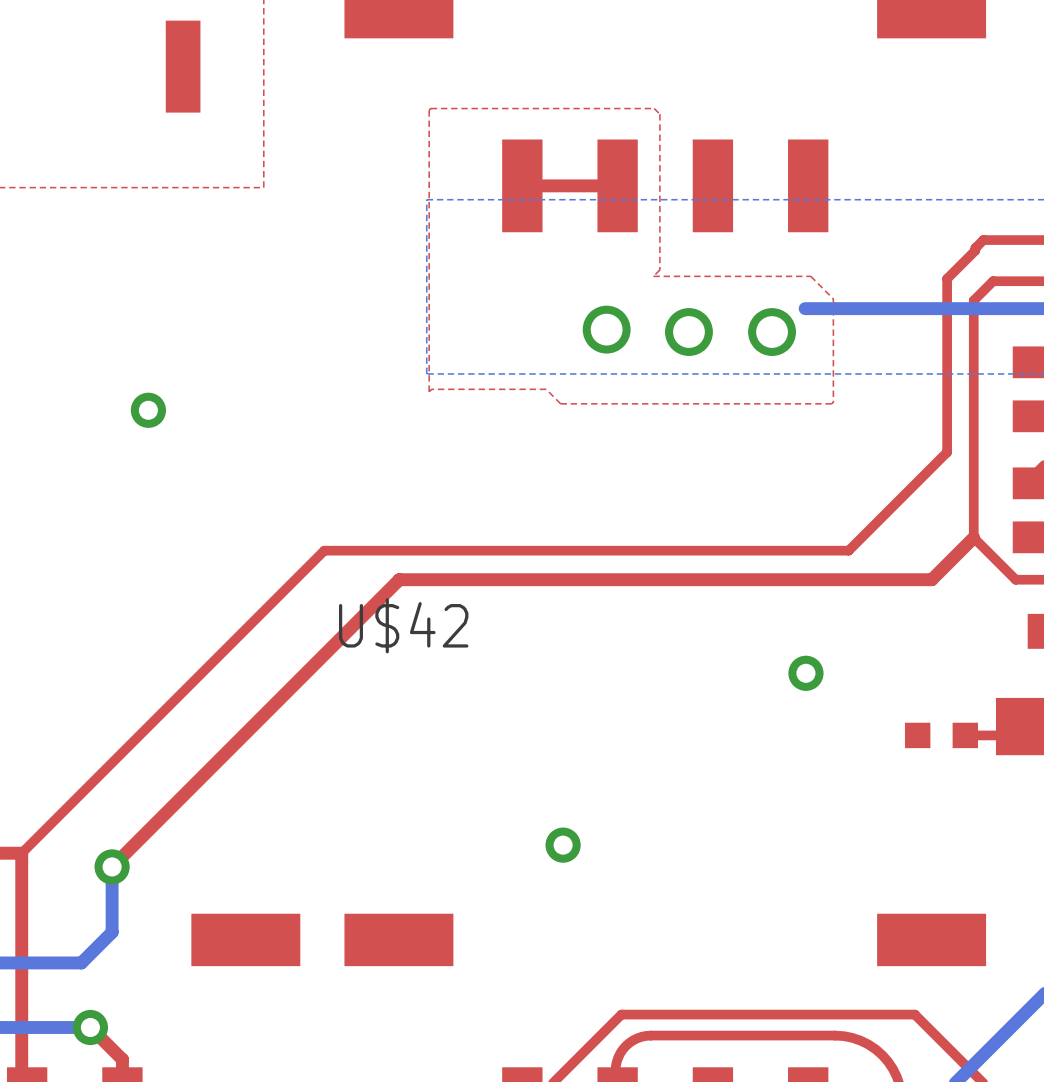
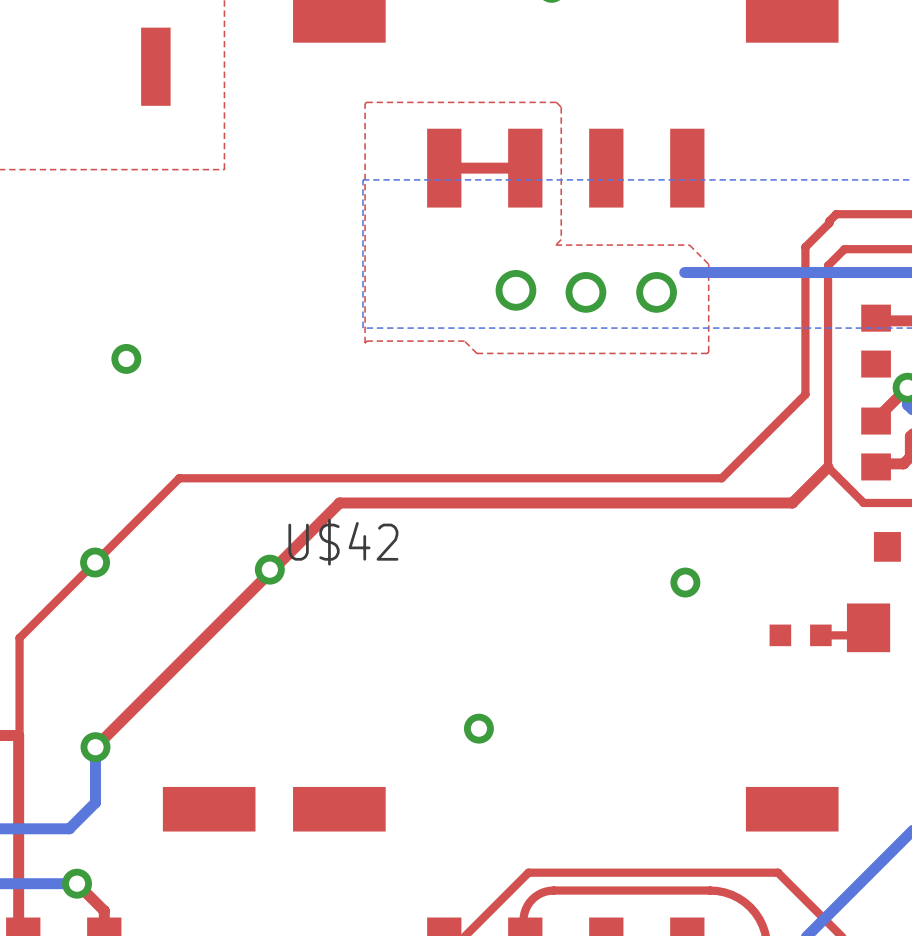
top track: (324, 550) (21, 853) -> (275, 478) (179, 478) (19, 638) (18, 735)
via: none -> (95, 562)
via: none -> (269, 569)

